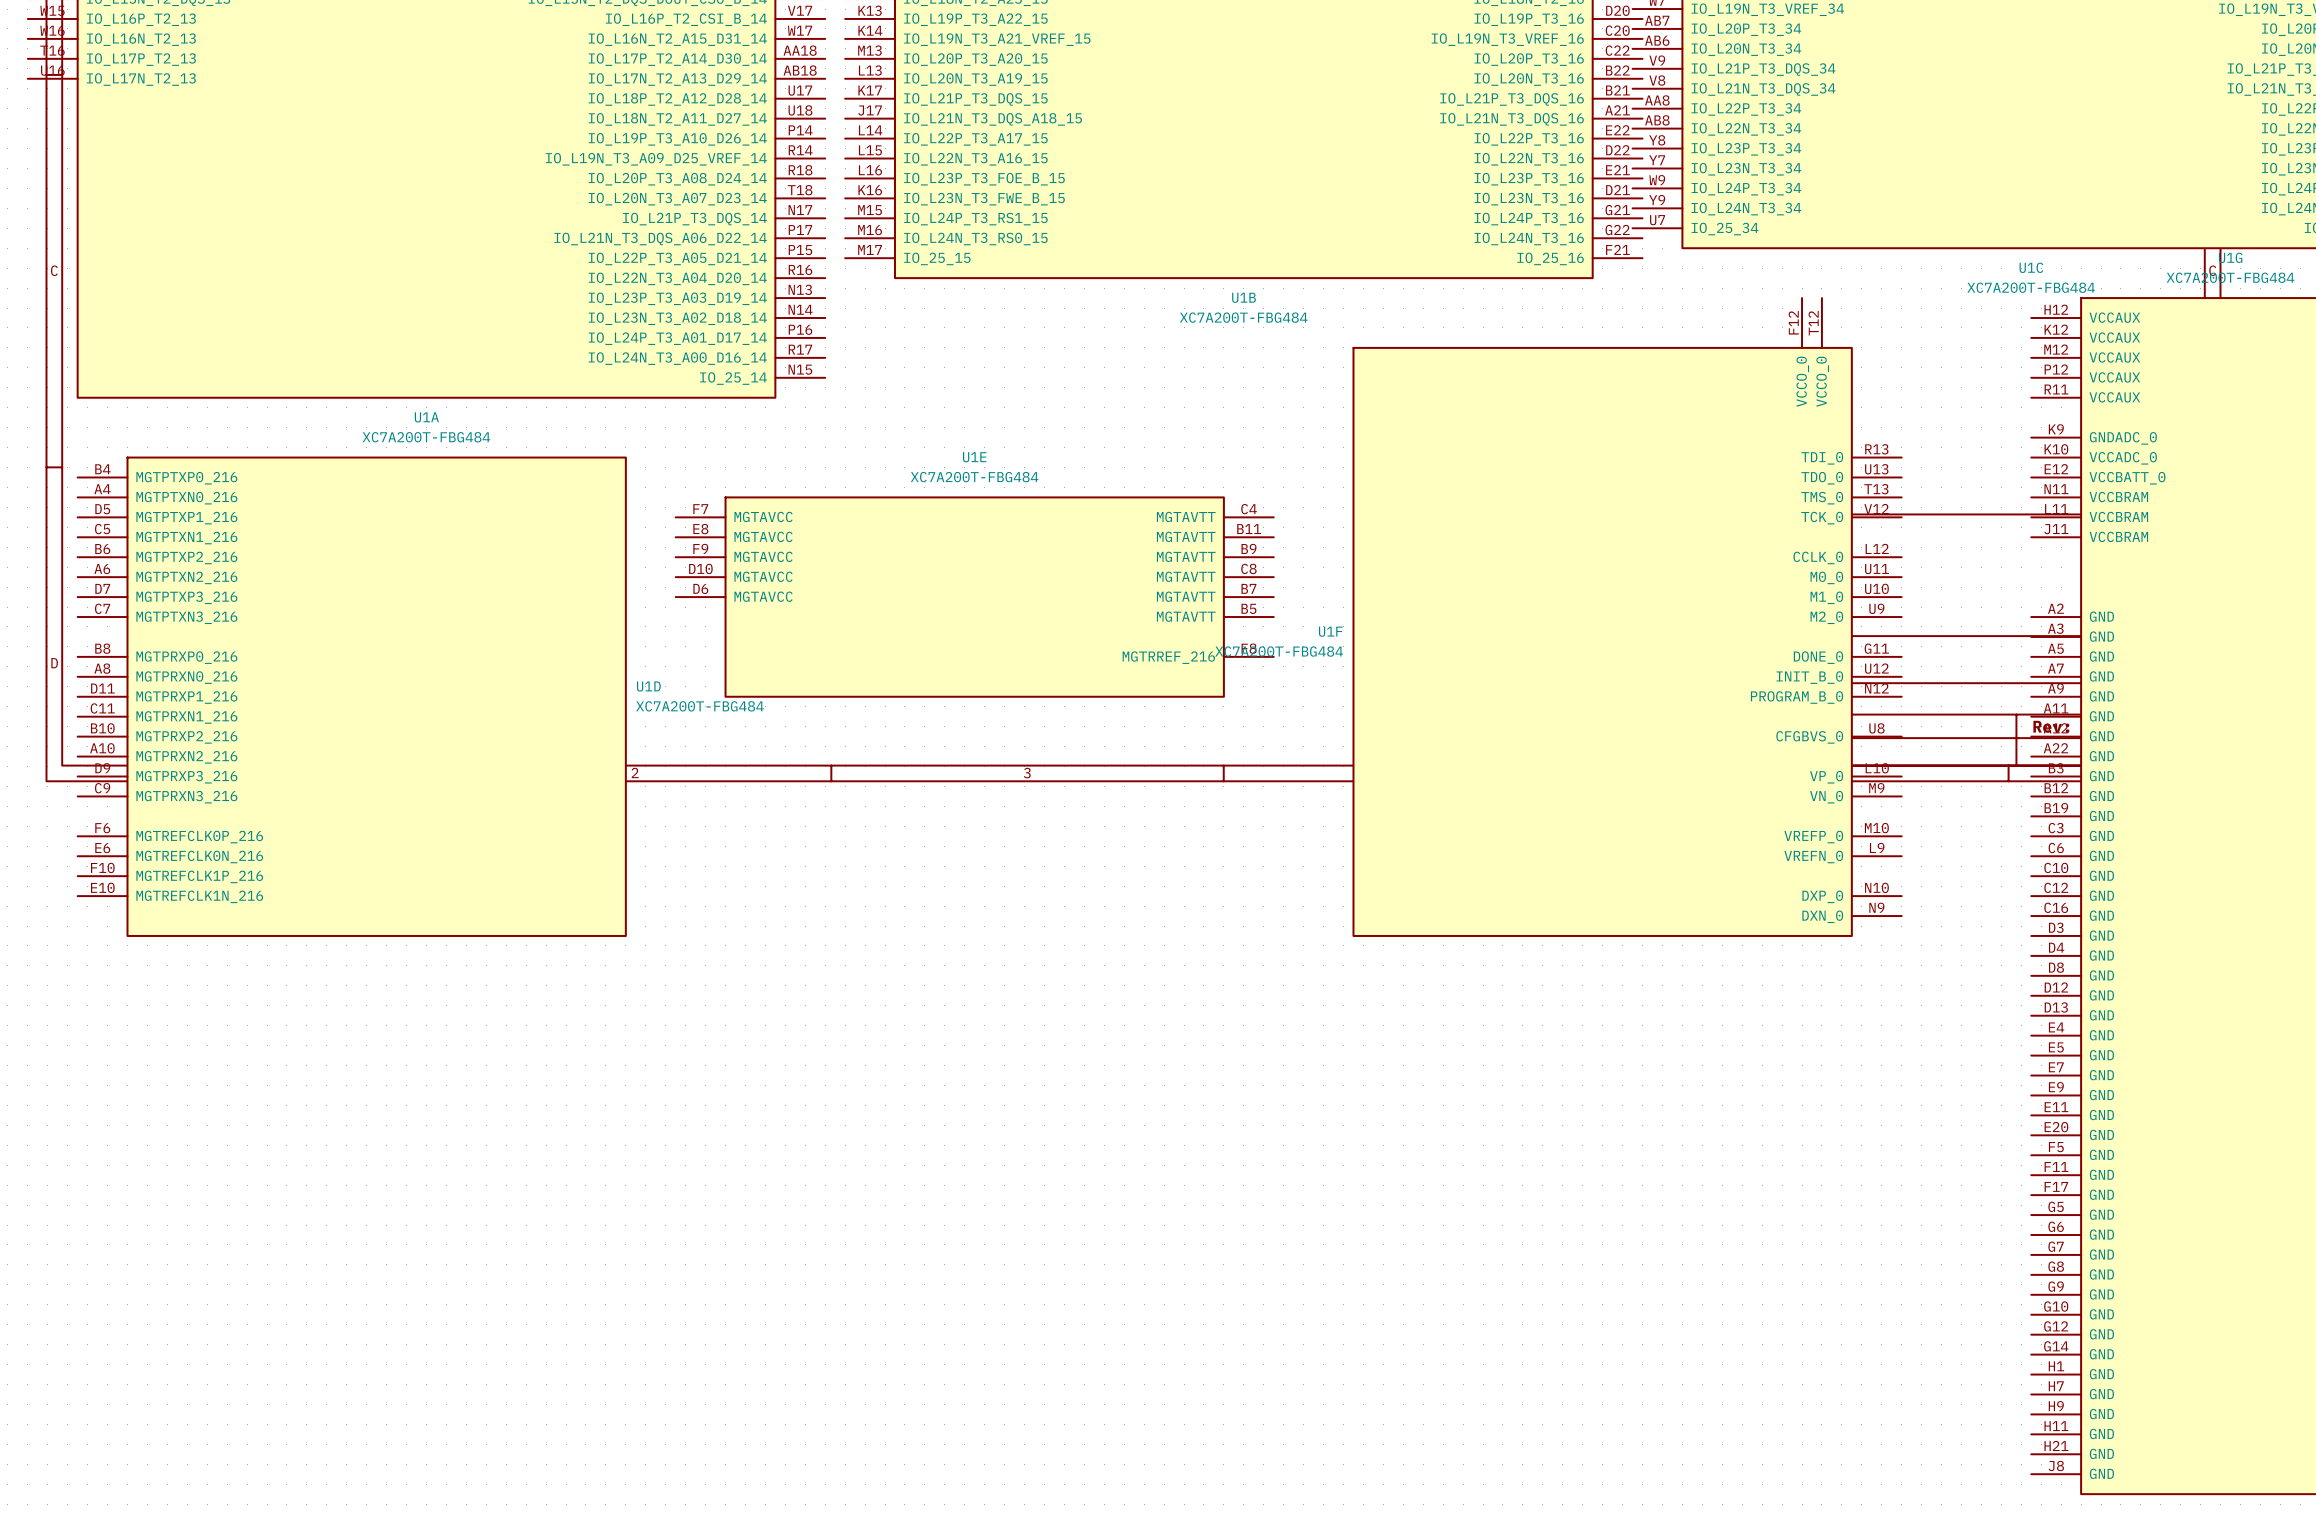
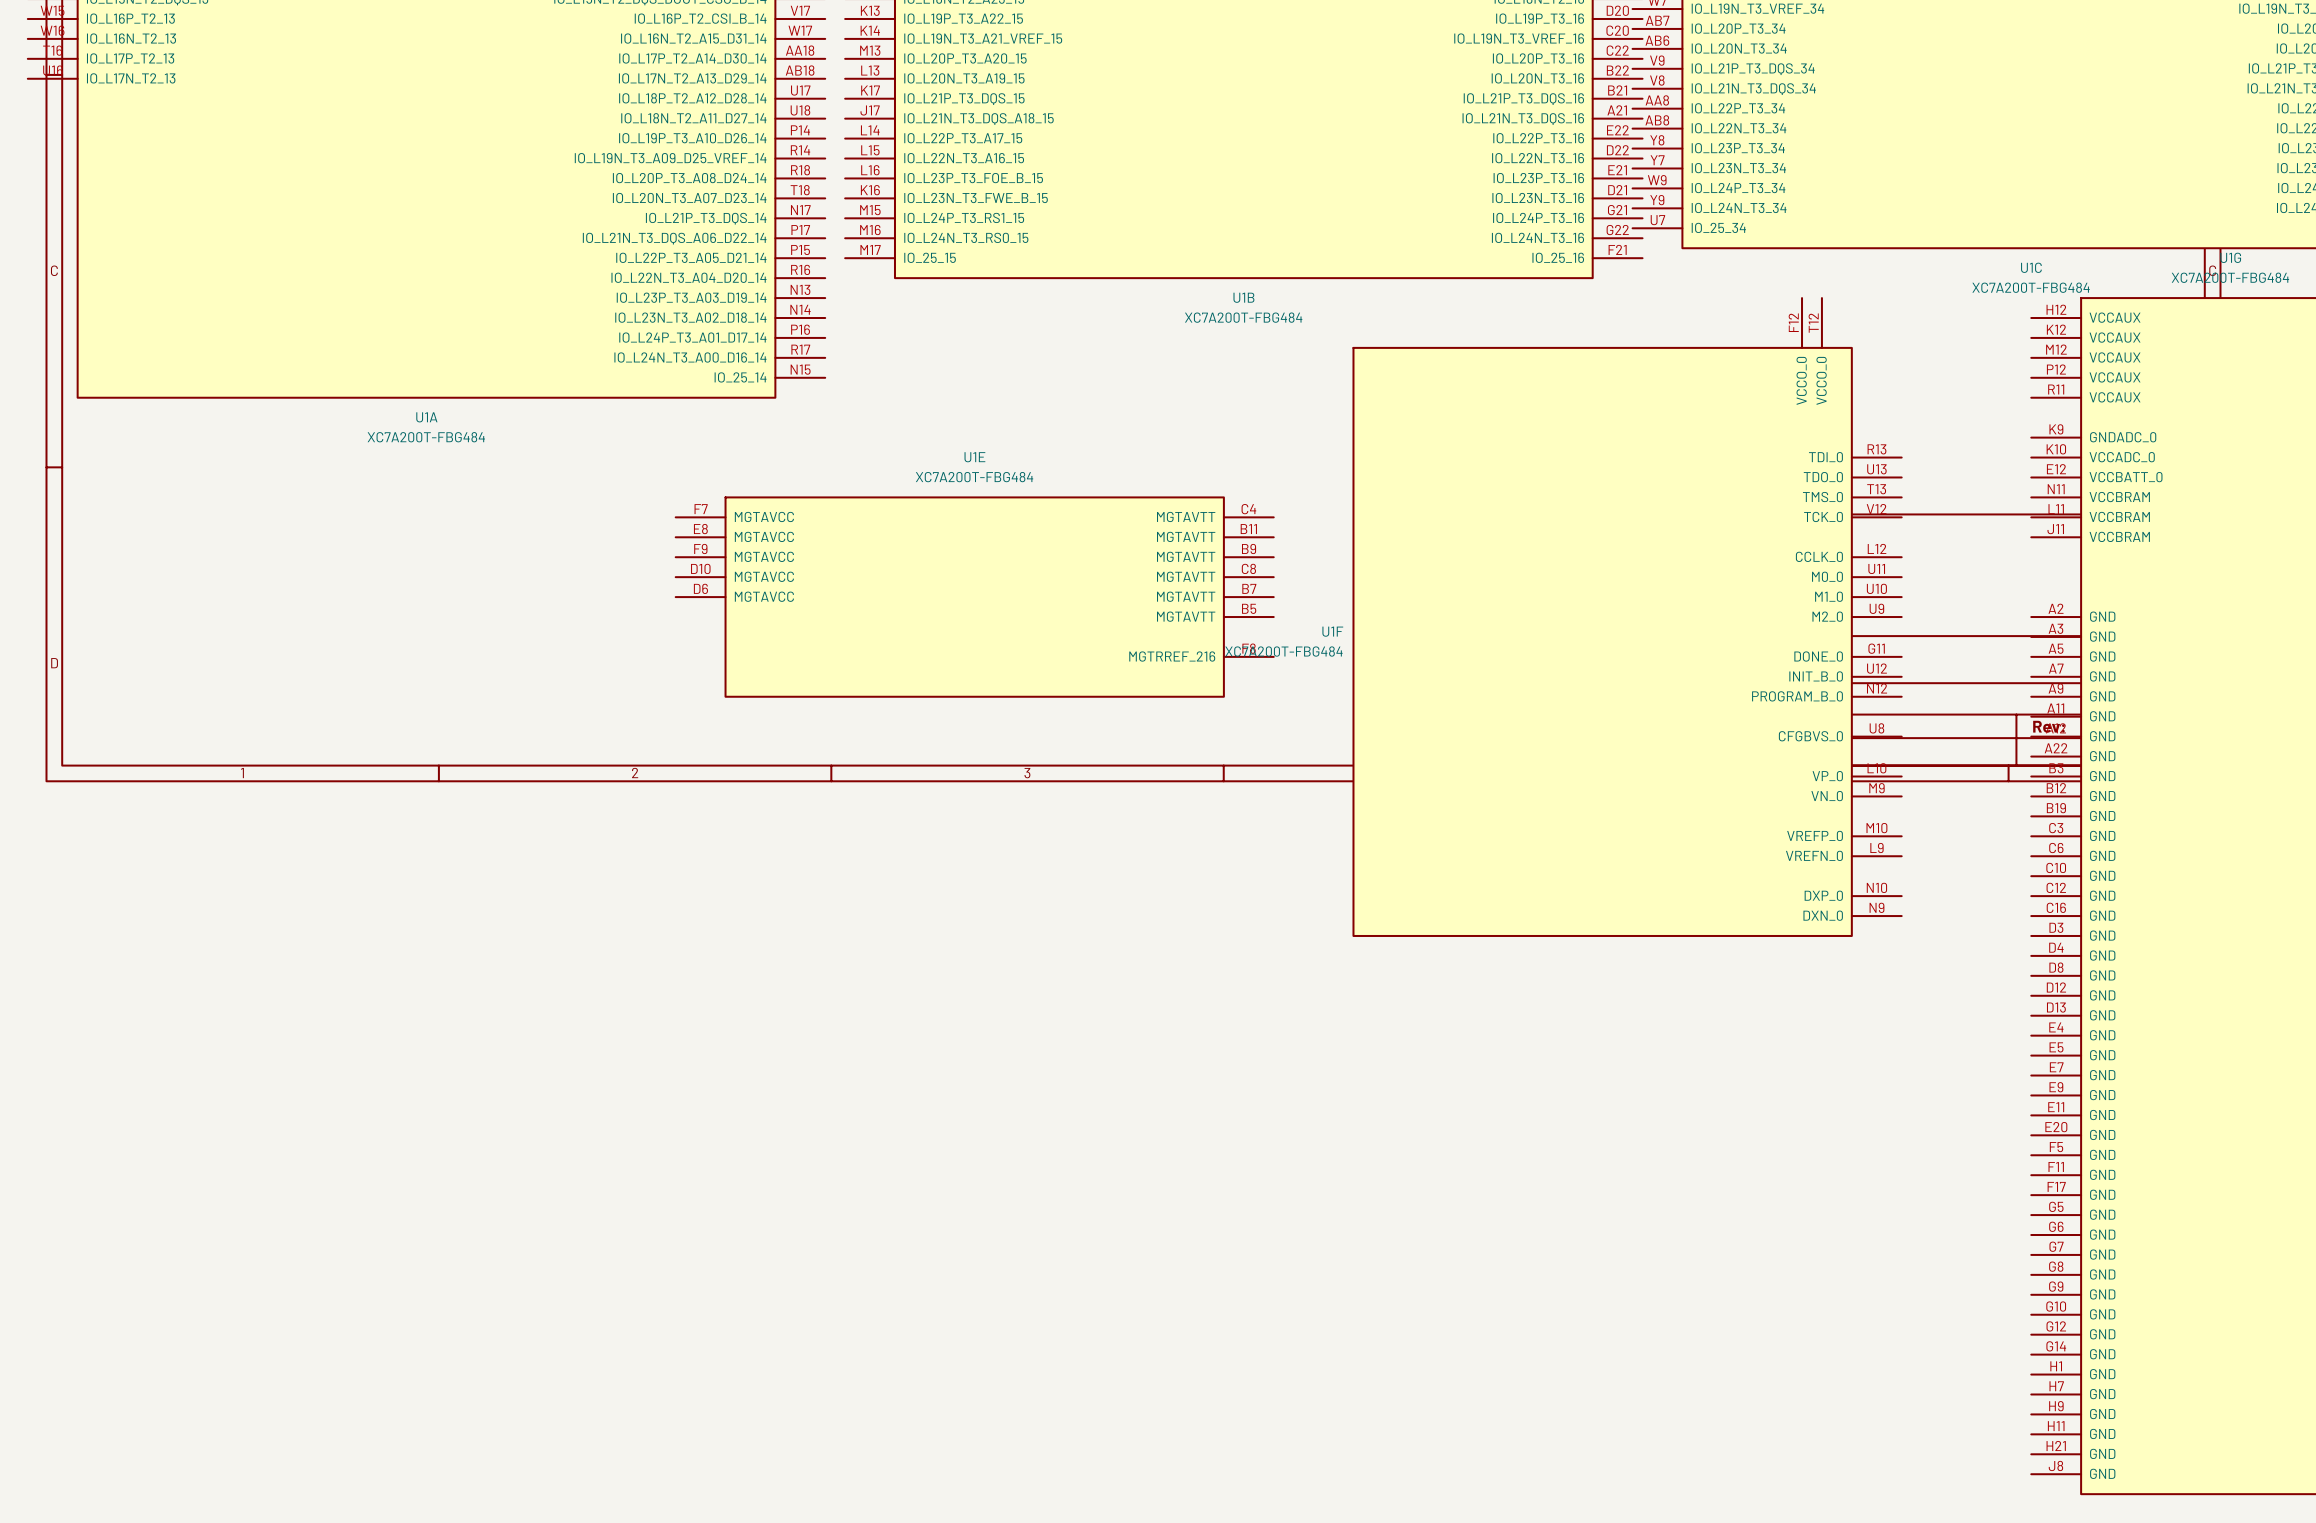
U1D: XC7A200T-FBG484 (352, 696) -> none

